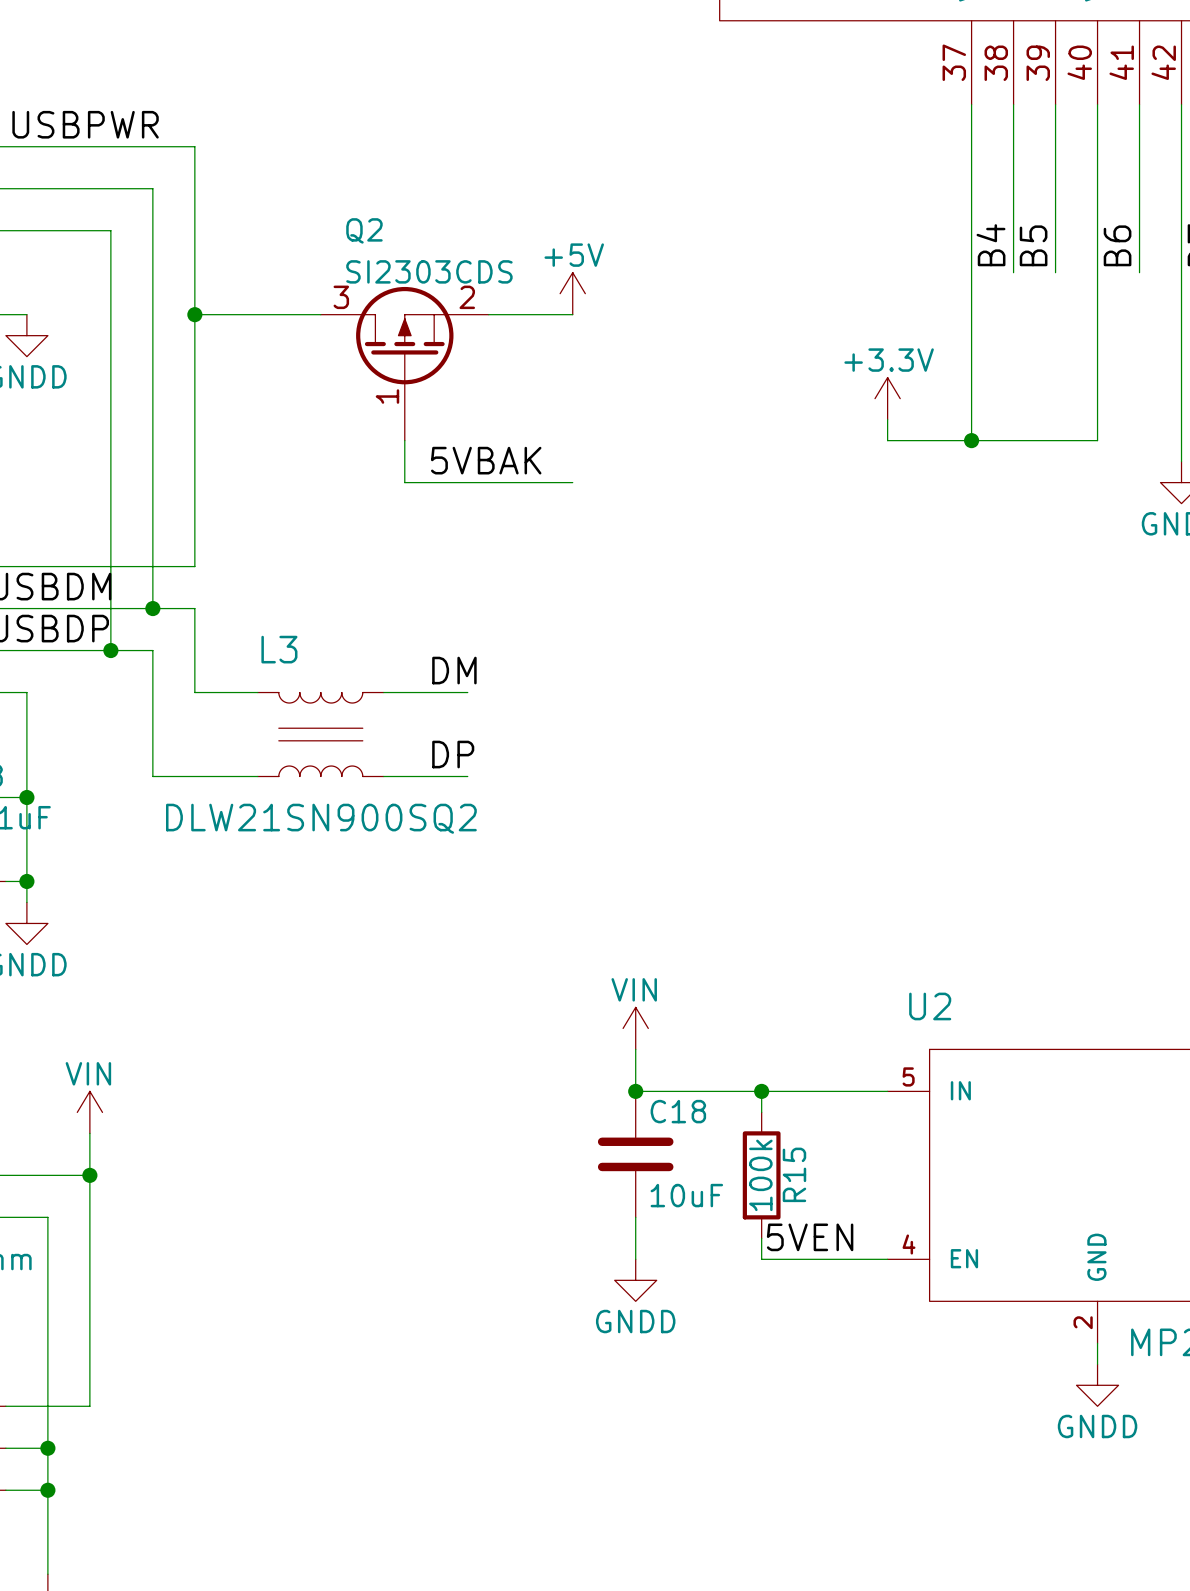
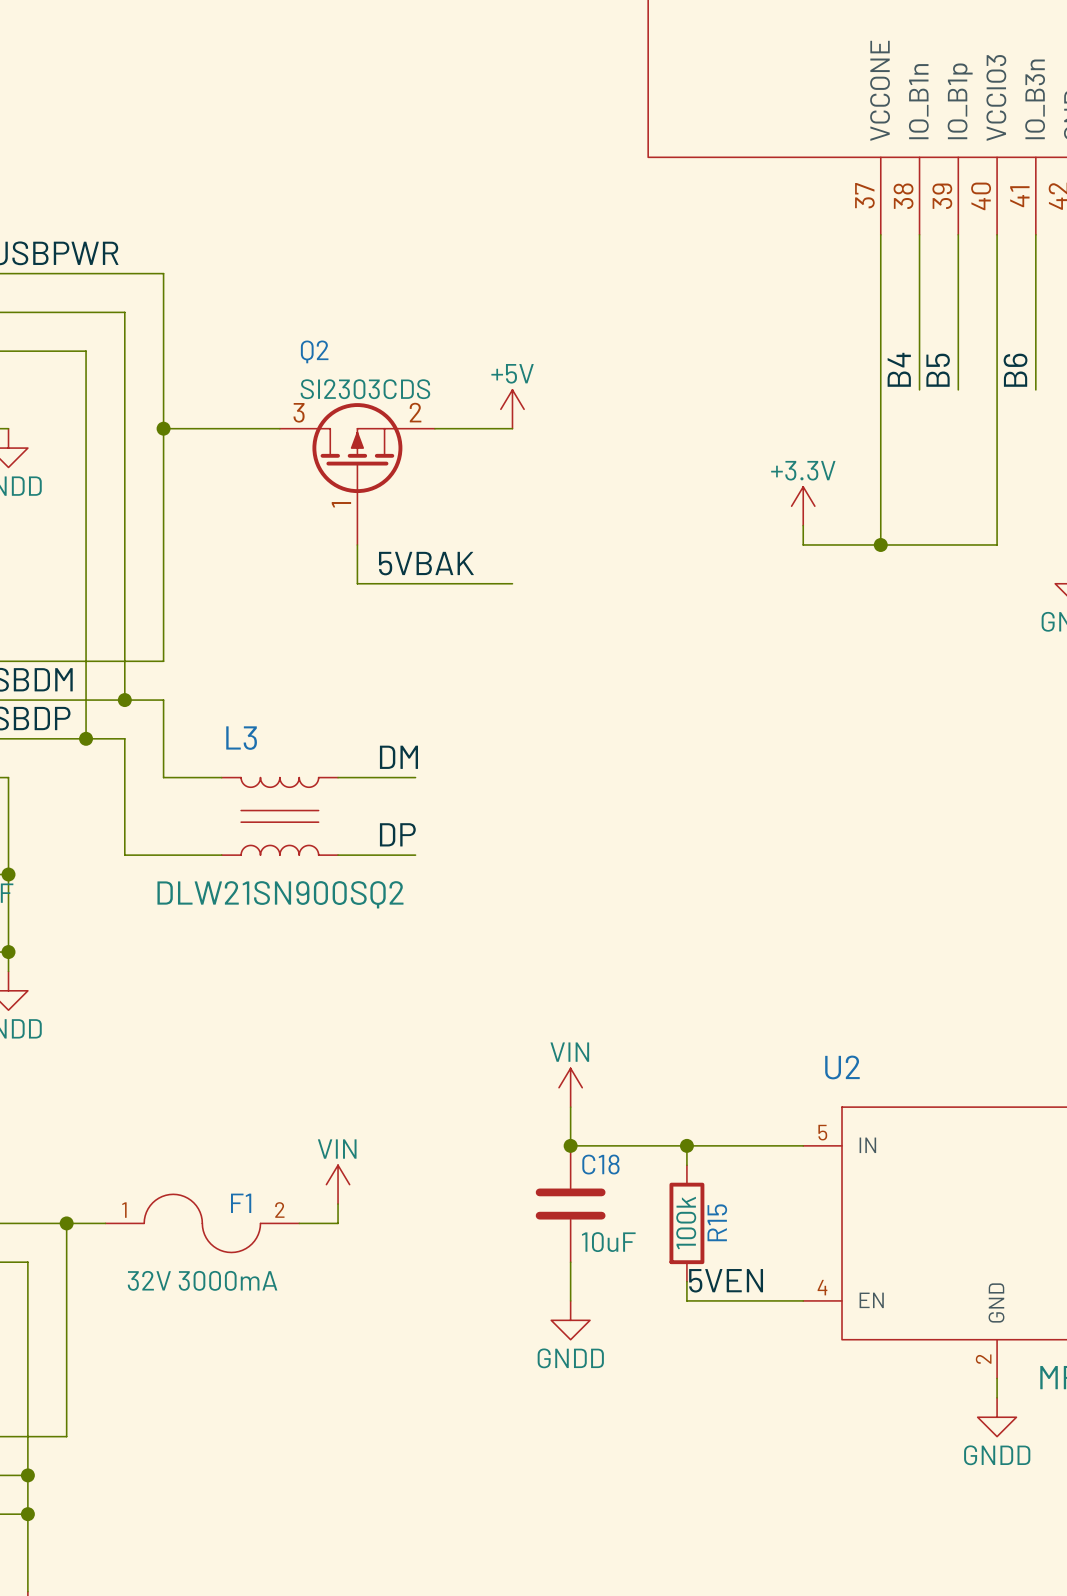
power symbol position: VIN (89, 1112) -> VIN (338, 1184)
wire: (89, 1133) (89, 1175) -> (105, 1223) (66, 1223)
wire: none -> (338, 1204) (338, 1223) (299, 1223)
F1: none -> 32V 3000mA (202, 1223)

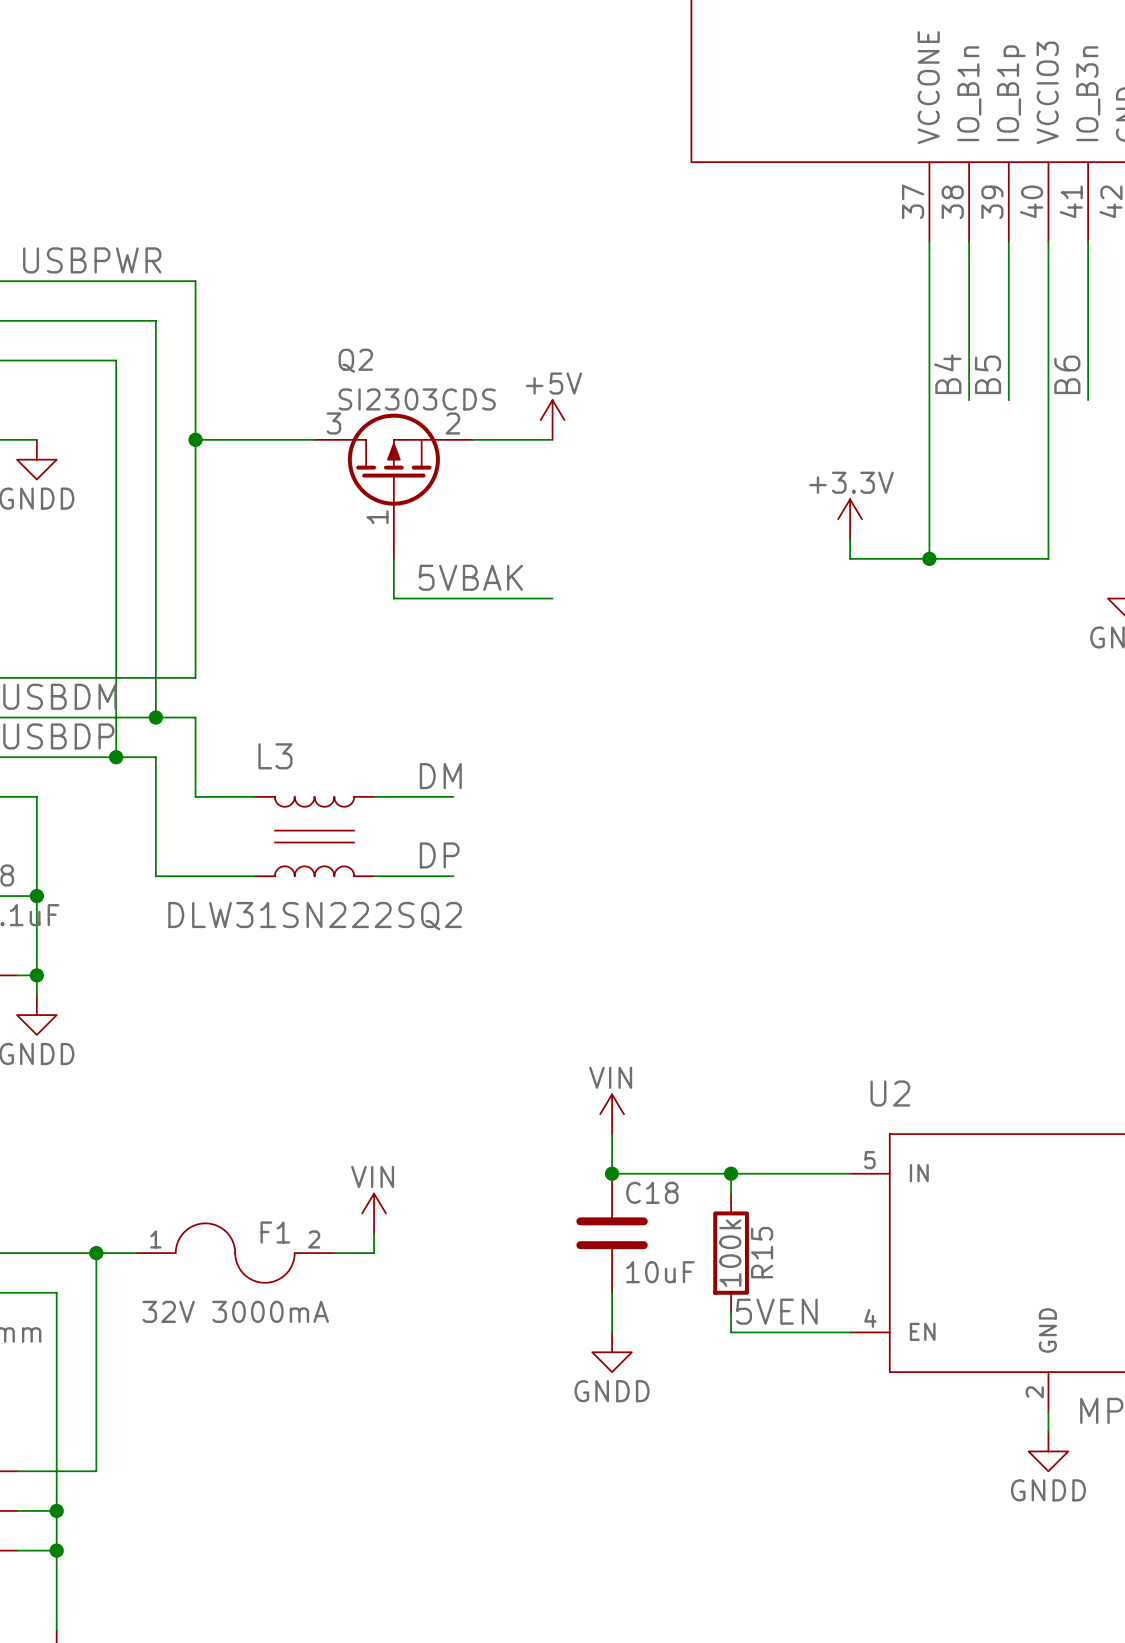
L3 value: DLW21SN900SQ2 (280, 894) -> DLW31SN222SQ2 (315, 916)

